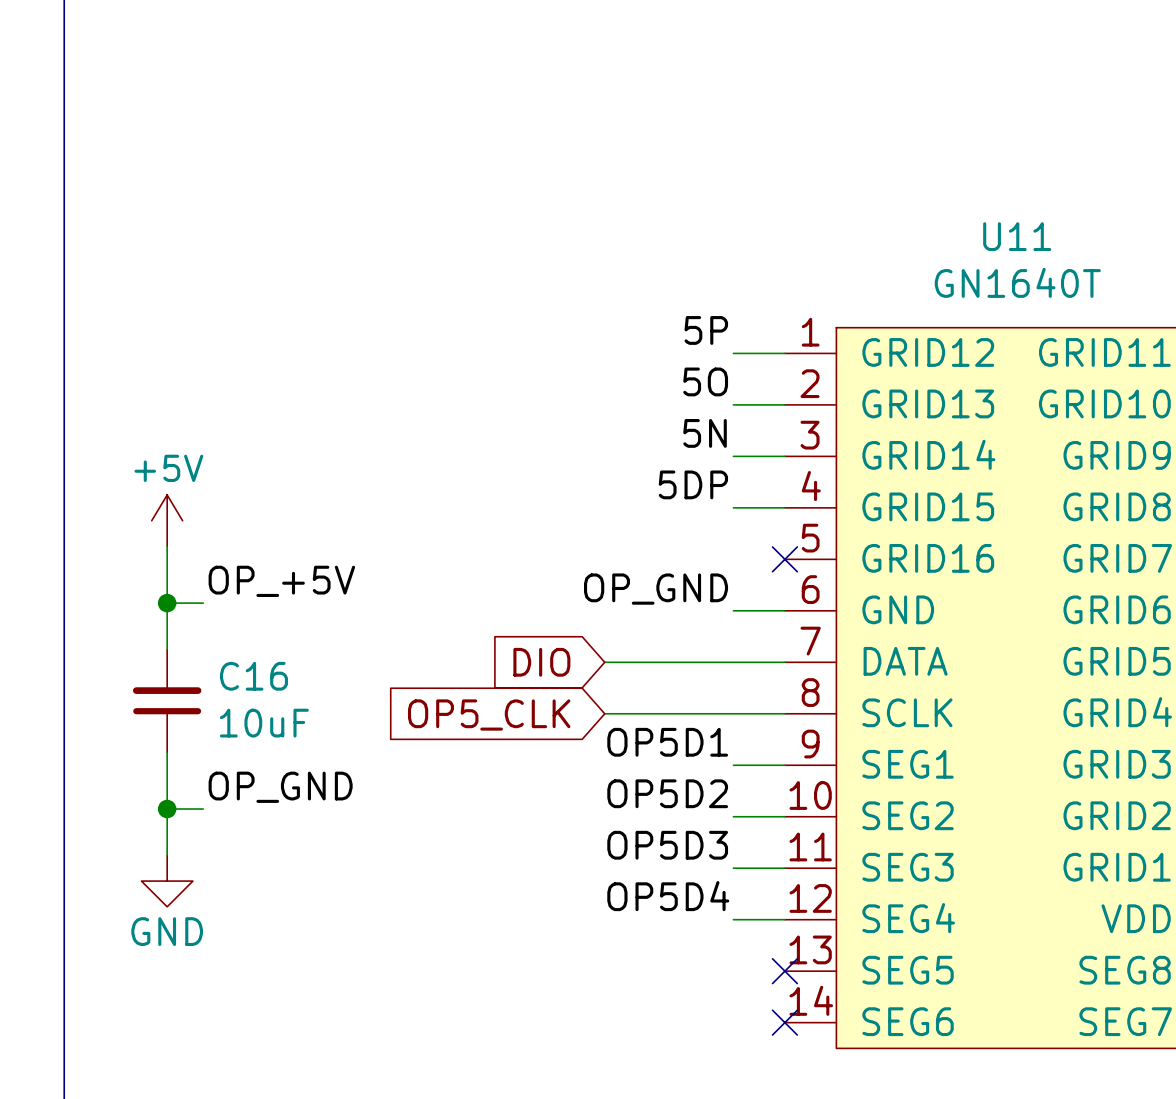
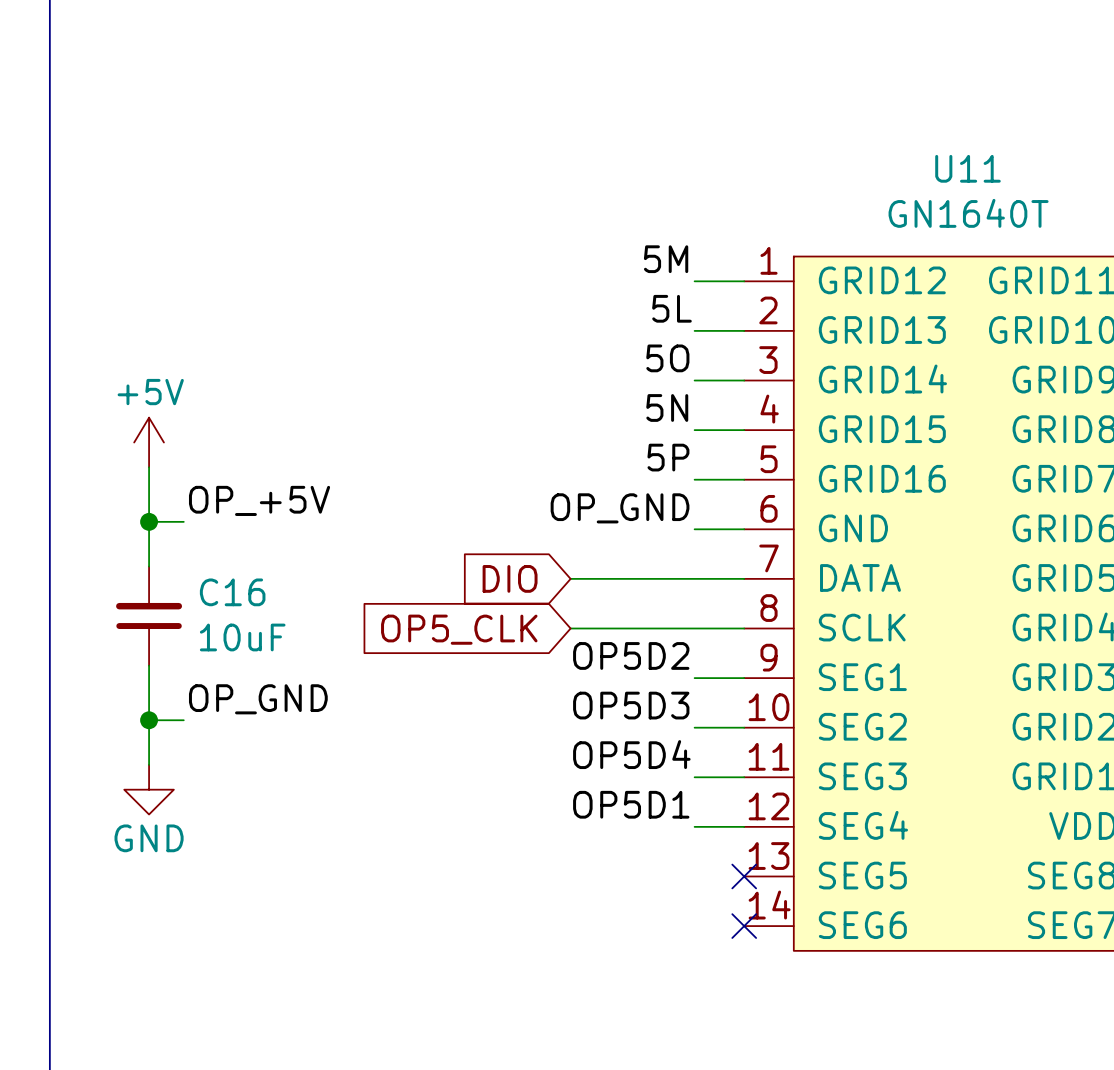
label: 5P (706, 330) -> 5M (666, 259)
label: 5O (705, 381) -> 5L (671, 308)
label: 5N (705, 433) -> 5O (667, 358)
label: 5DP (693, 484) -> 5N (667, 407)
label: none -> 5P (668, 457)
wire: none -> (694, 479) (744, 479)
no-connect mark: (784, 559) -> none
label: OP5D1 (667, 742) -> OP5D2 (631, 655)
label: OP5D2 (667, 793) -> OP5D3 (631, 705)
label: OP5D3 (667, 845) -> OP5D4 (631, 754)
label: OP5D4 (668, 896) -> OP5D1 (631, 804)

